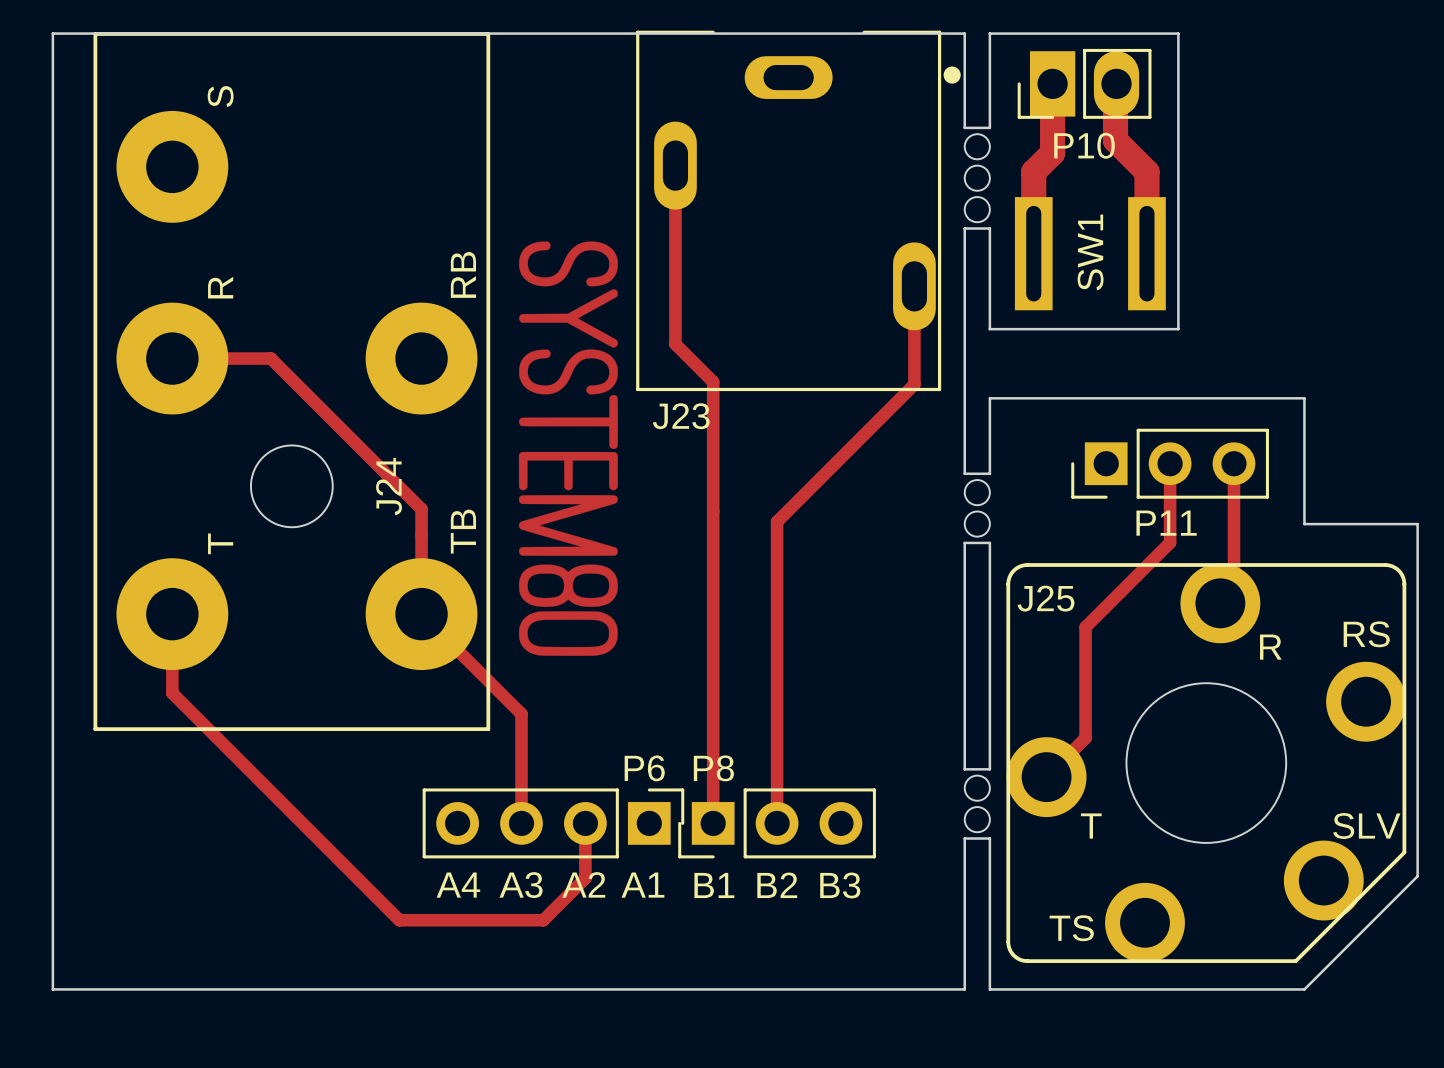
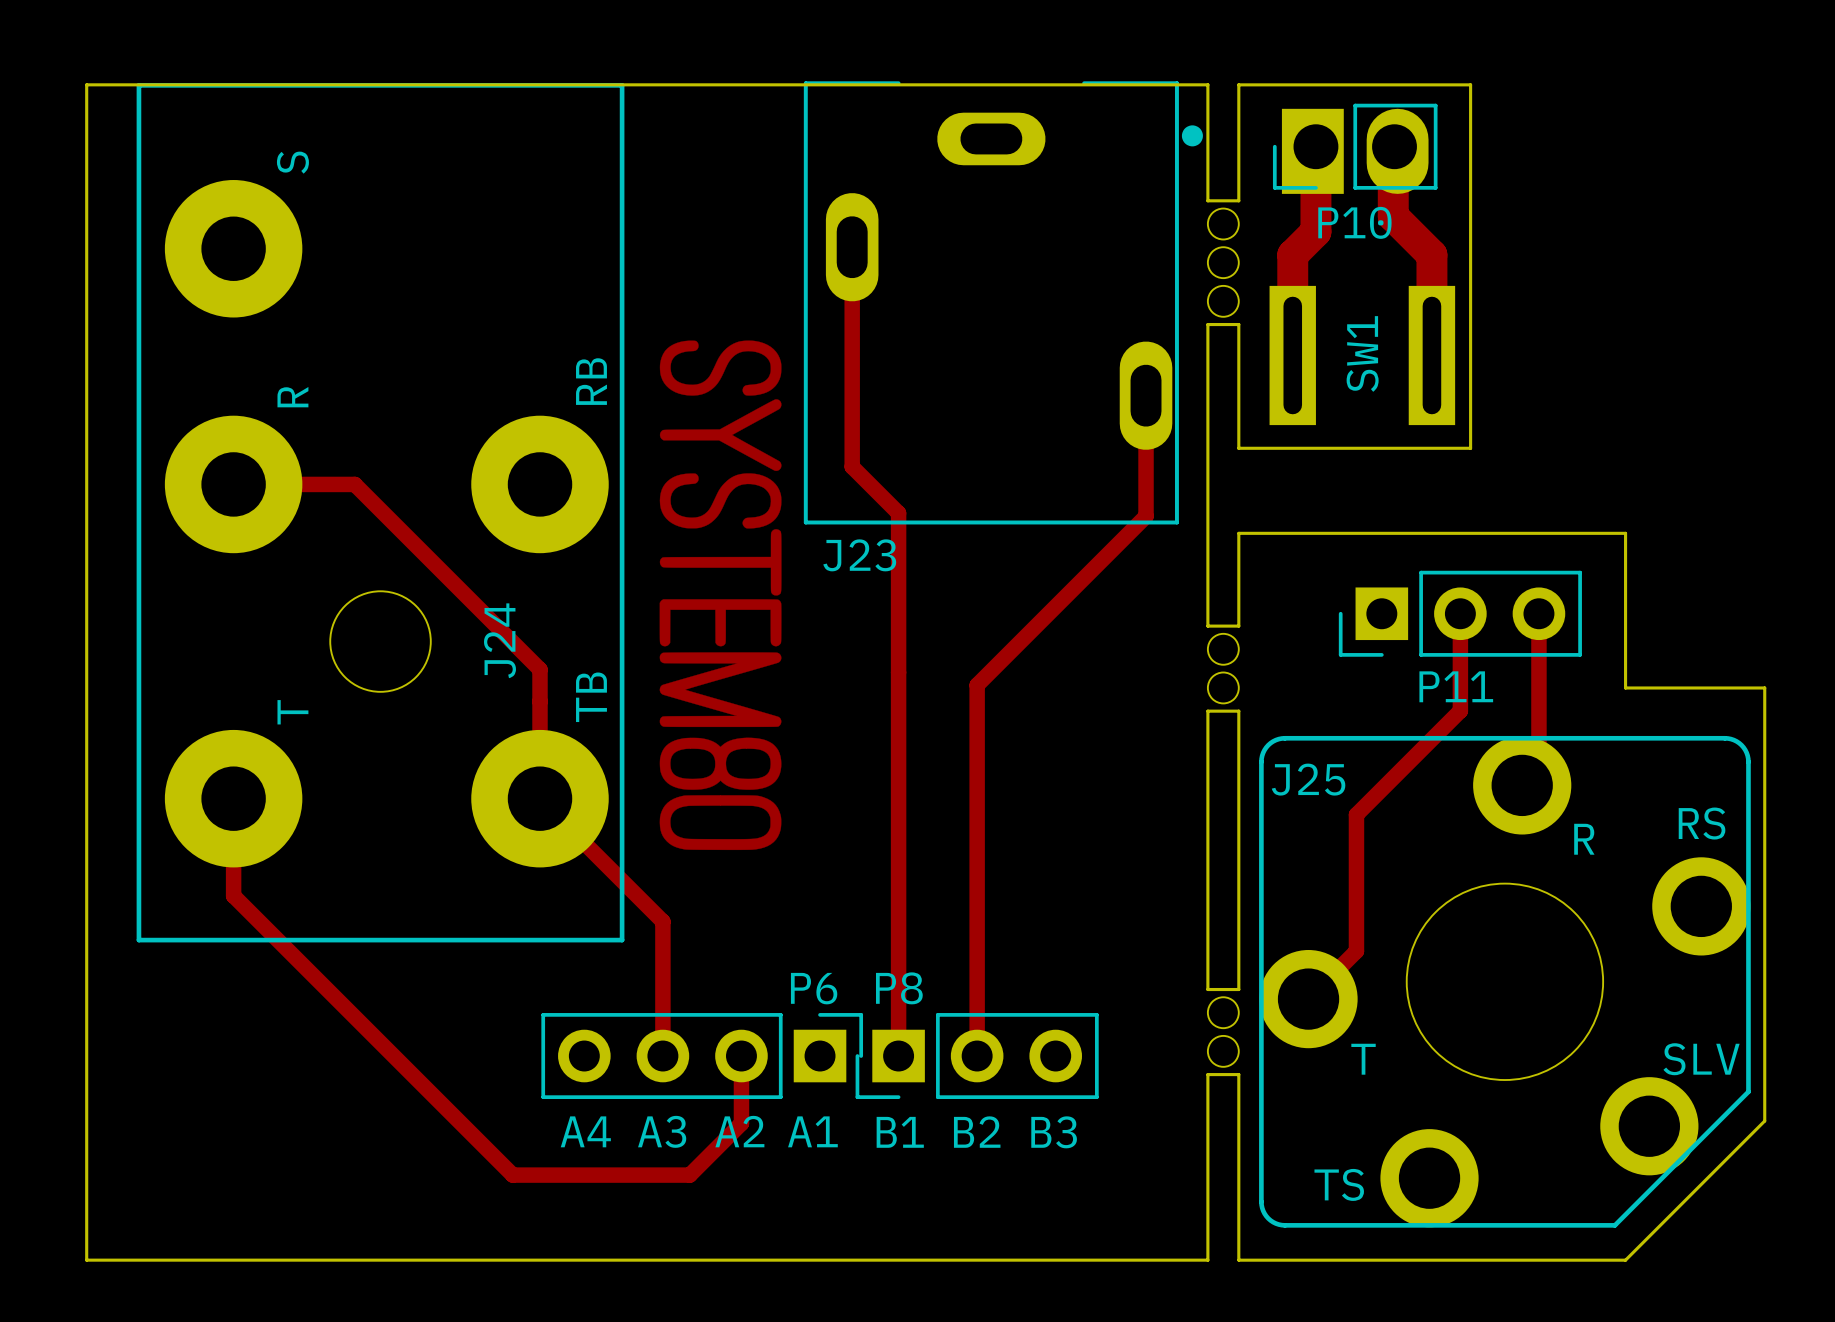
P10 footprint: [1017, 48, 1152, 119] -> [1272, 103, 1438, 194]

